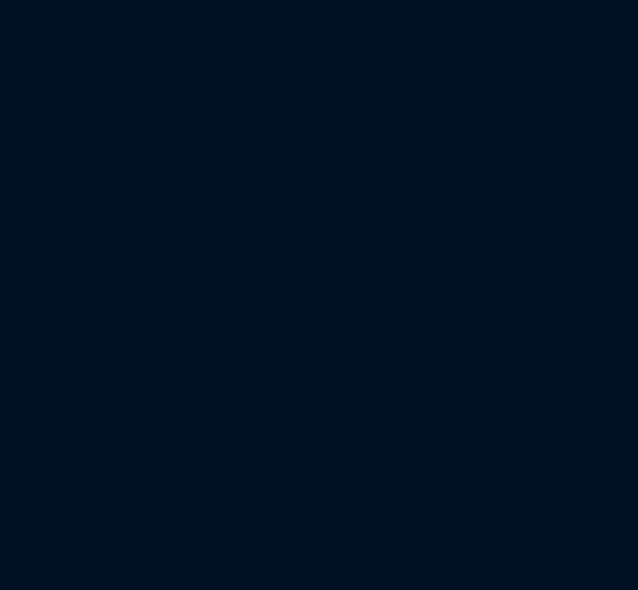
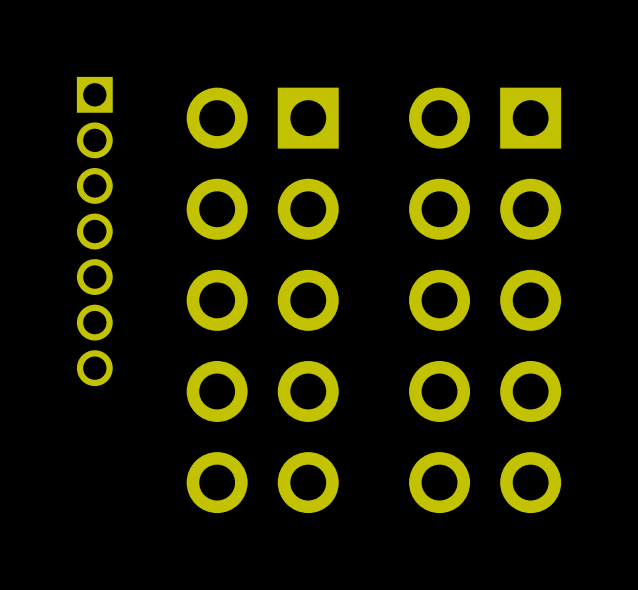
part: none -> (94, 231)
part: none -> (262, 300)
part: none -> (485, 300)

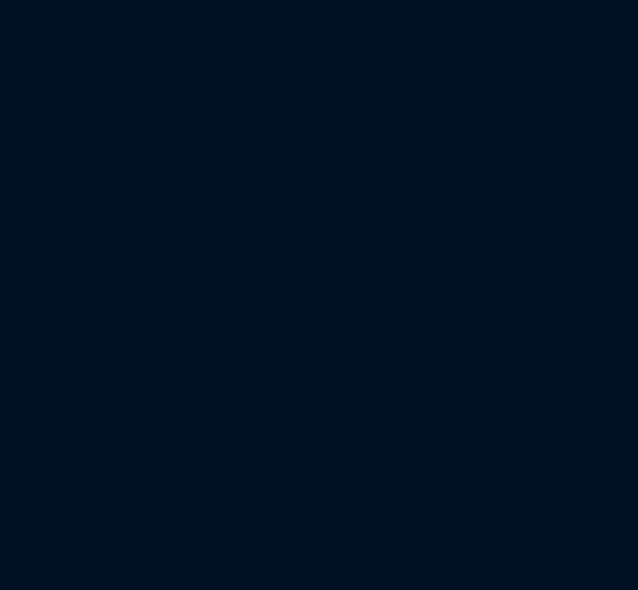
part: (94, 231) -> none
part: (262, 300) -> none
part: (485, 300) -> none

